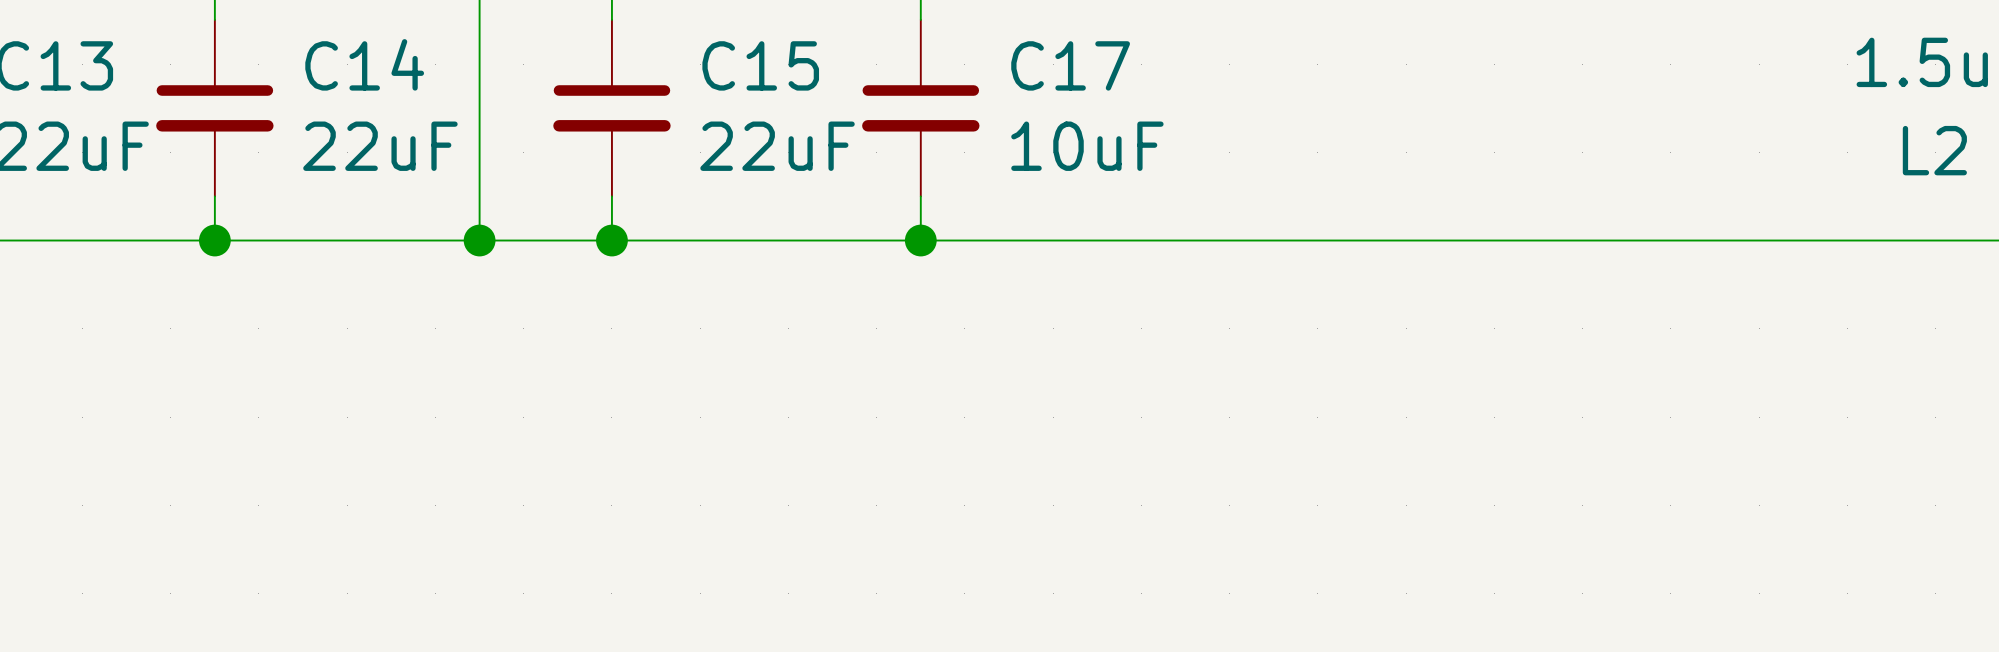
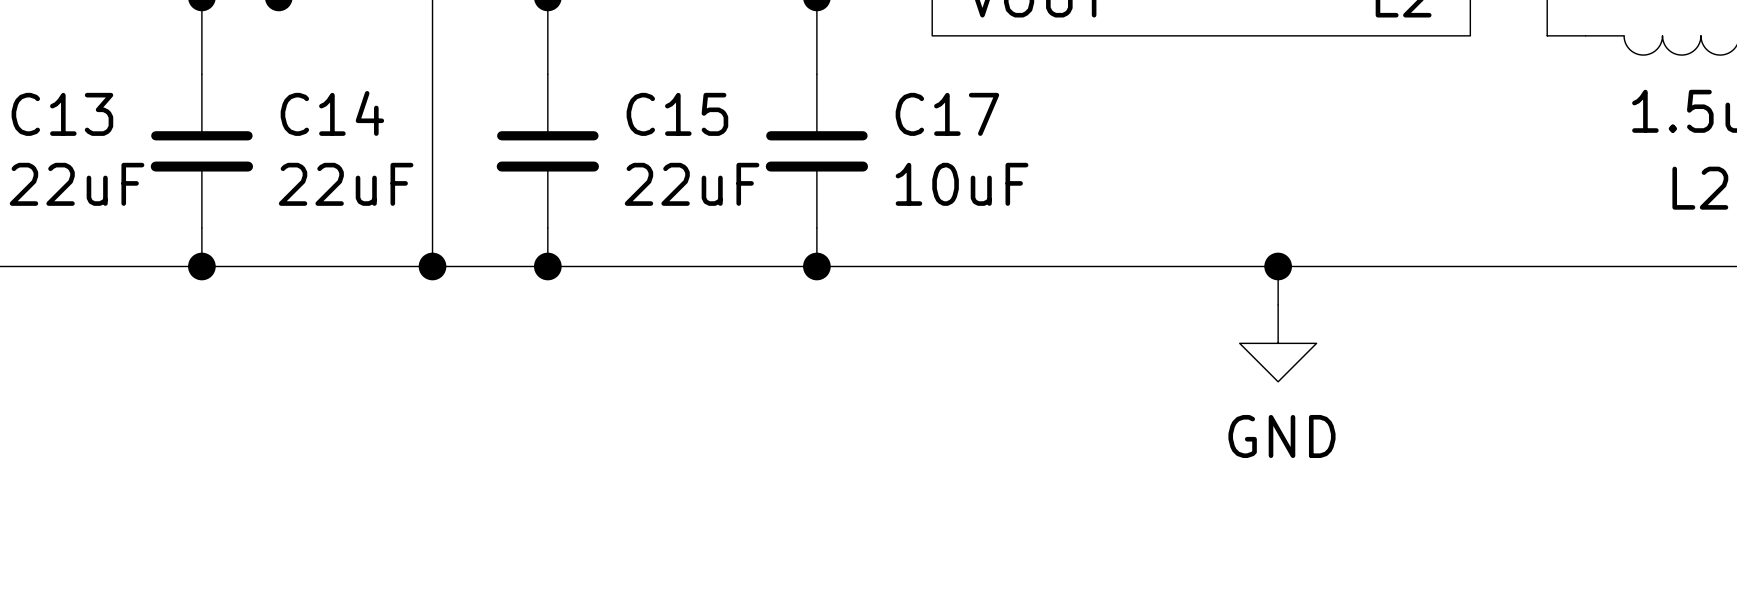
wire: none -> (1278, 266) (1278, 304)
junction: none -> (1278, 266)
power symbol: none -> GND (1278, 343)

